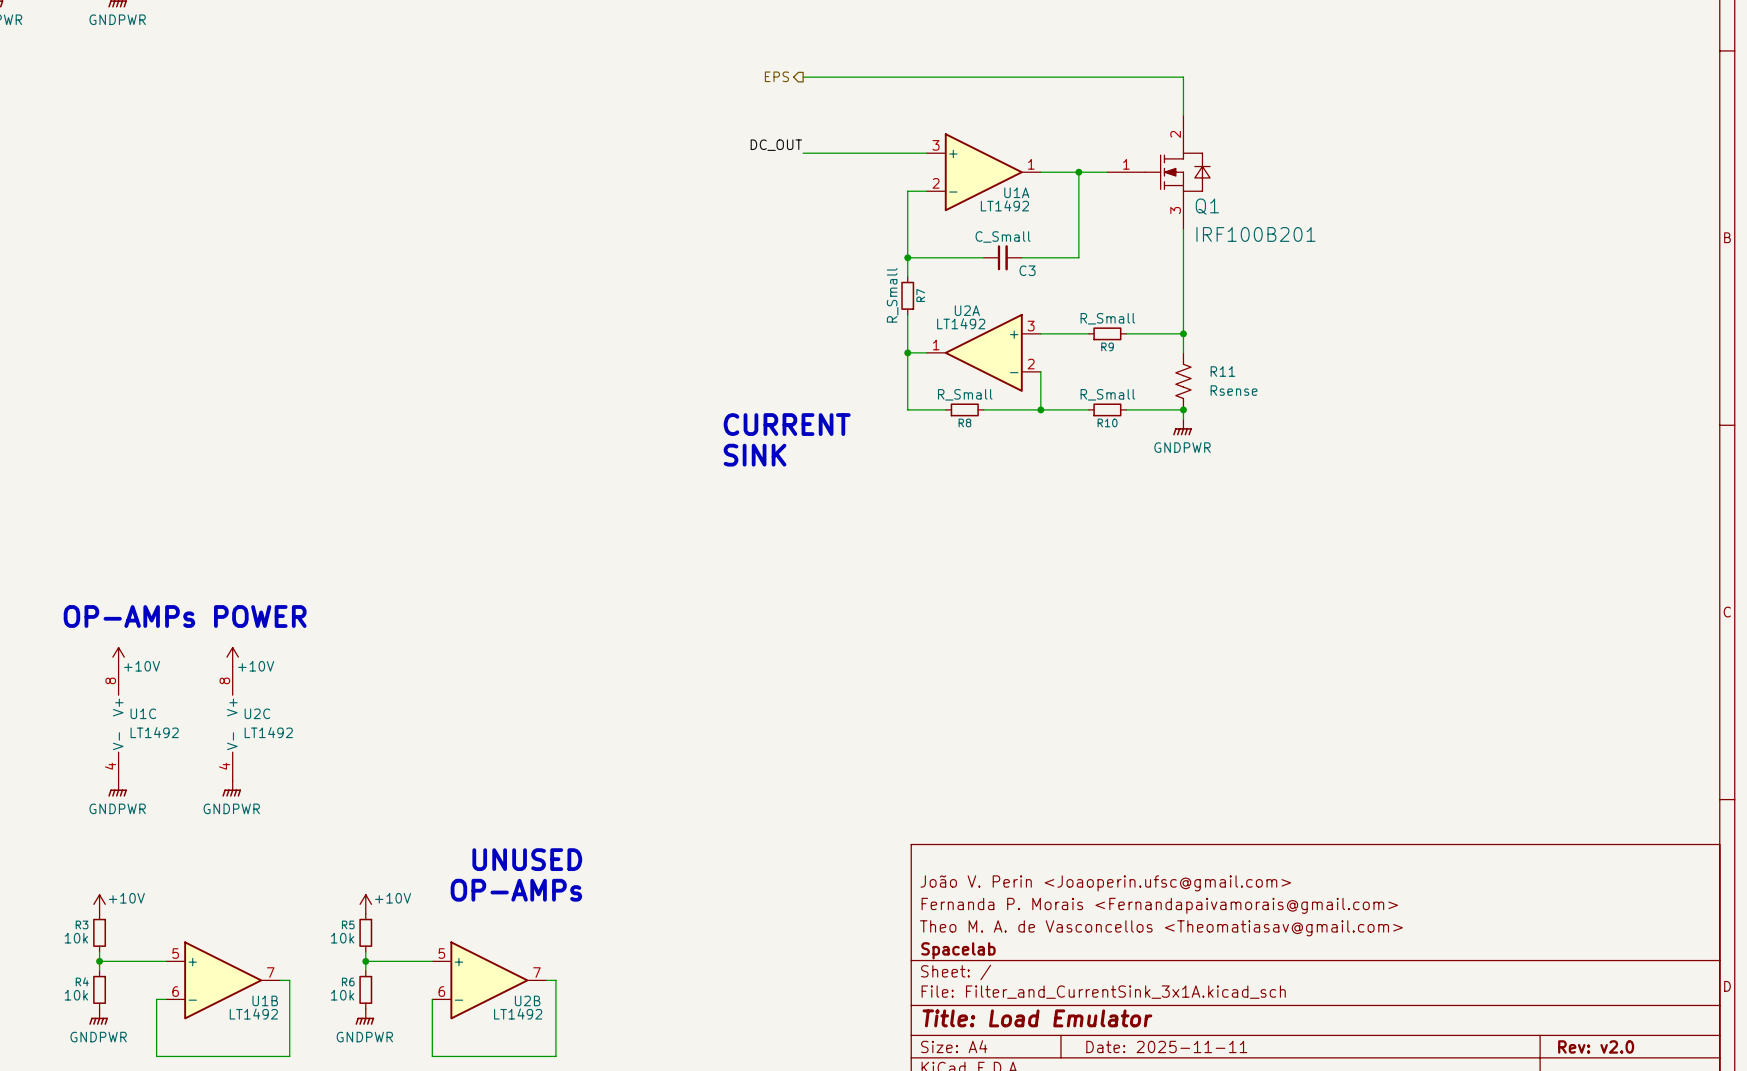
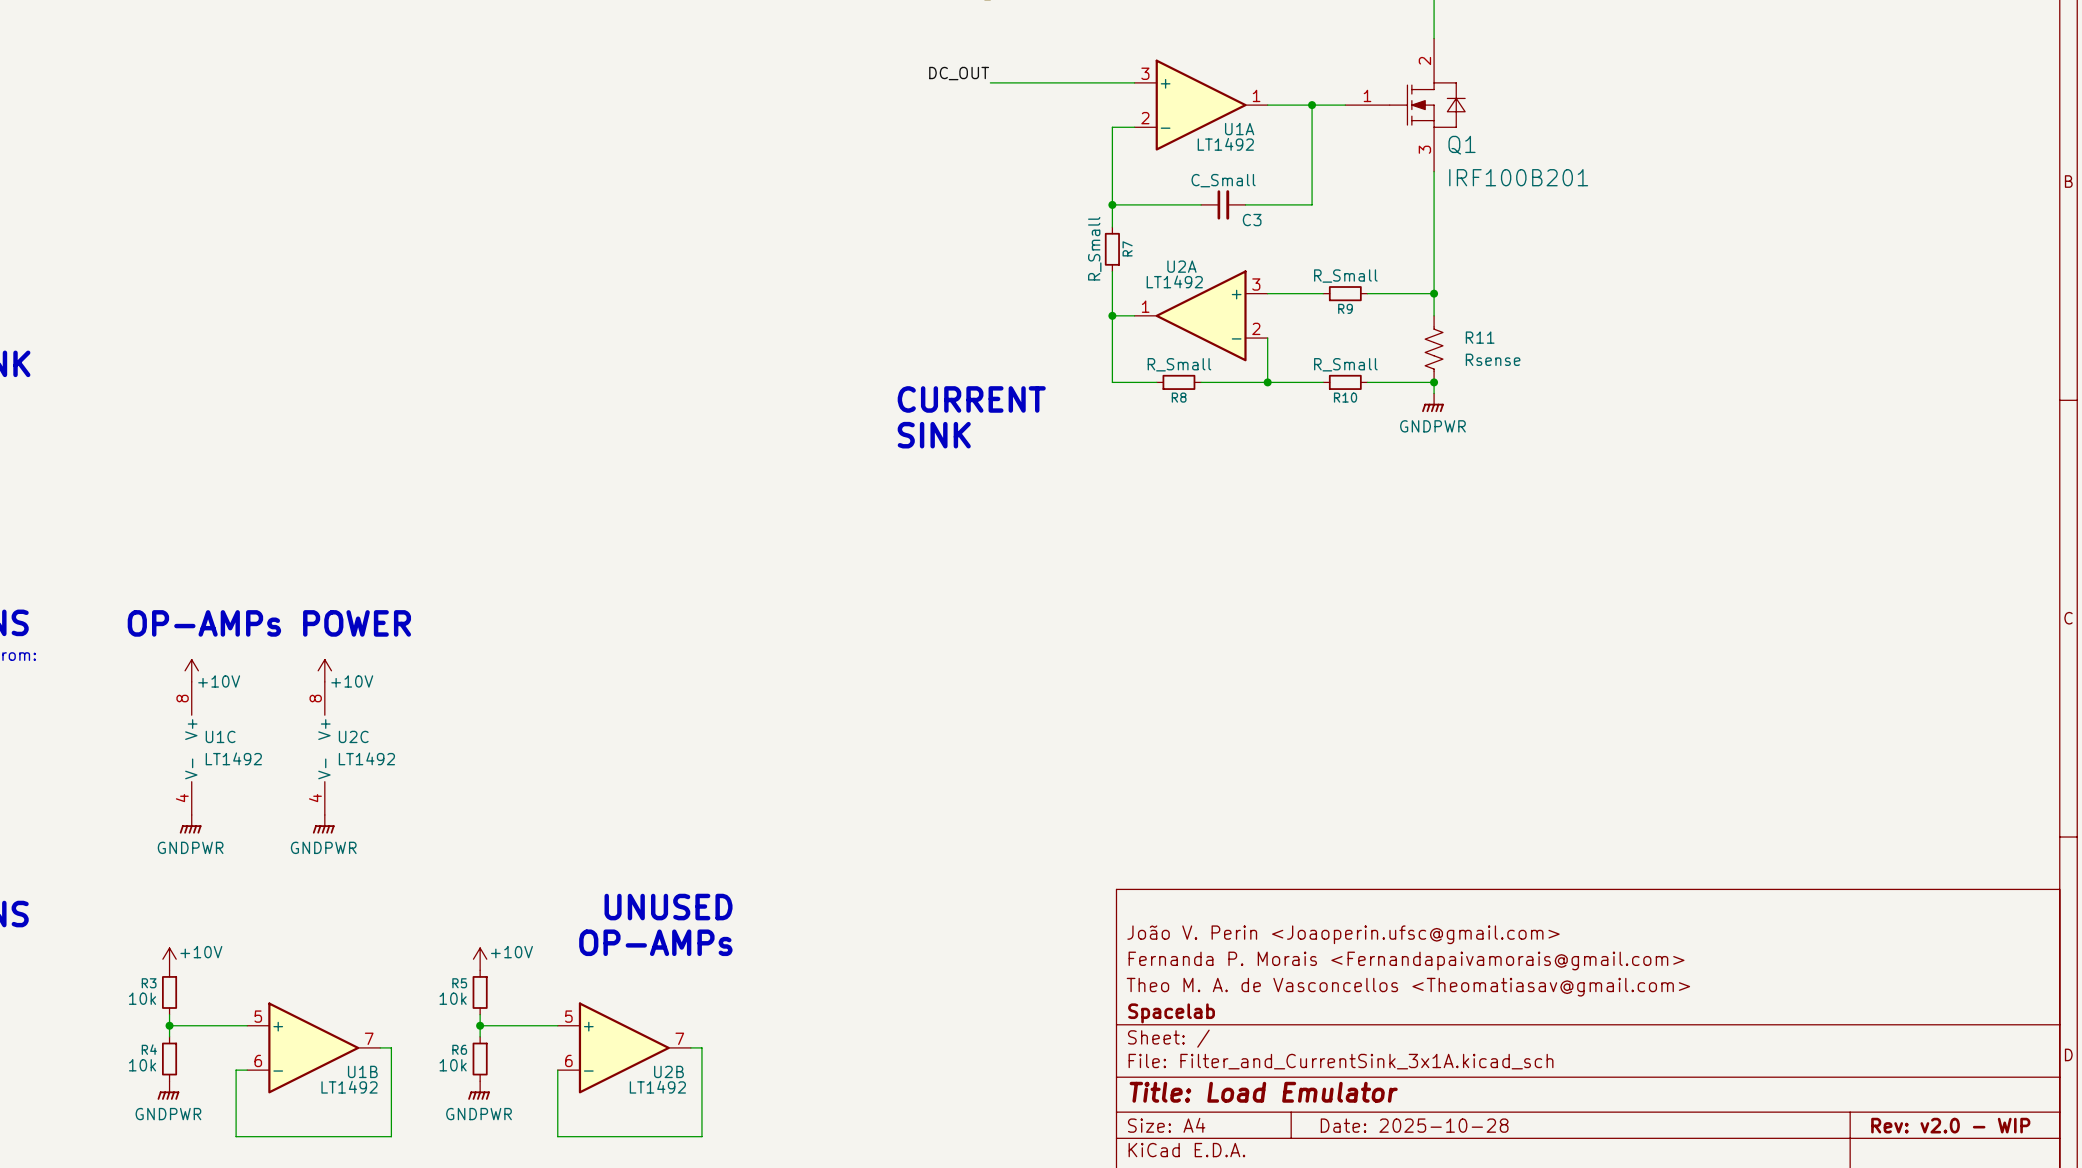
title block: Date: 2025-11-11 (1166, 1046) -> Date: 2025-10-28 (1414, 1125)
title block: Rev: v2.0 (1596, 1046) -> Rev: v2.0 - WIP (1950, 1125)

